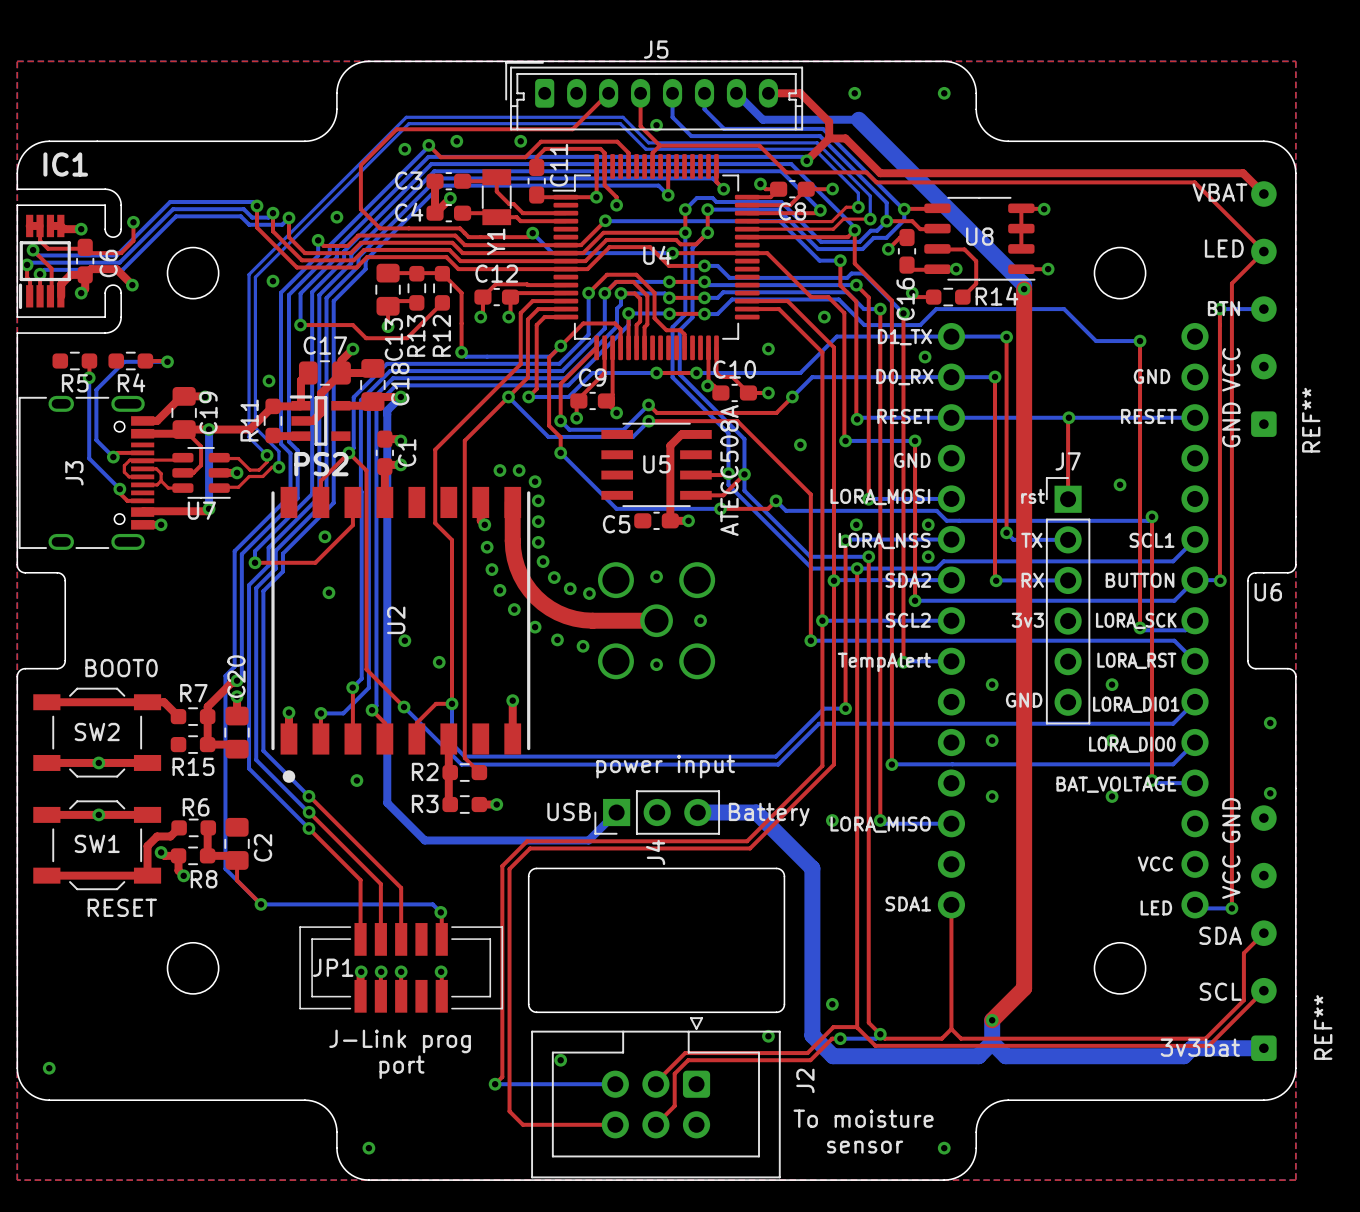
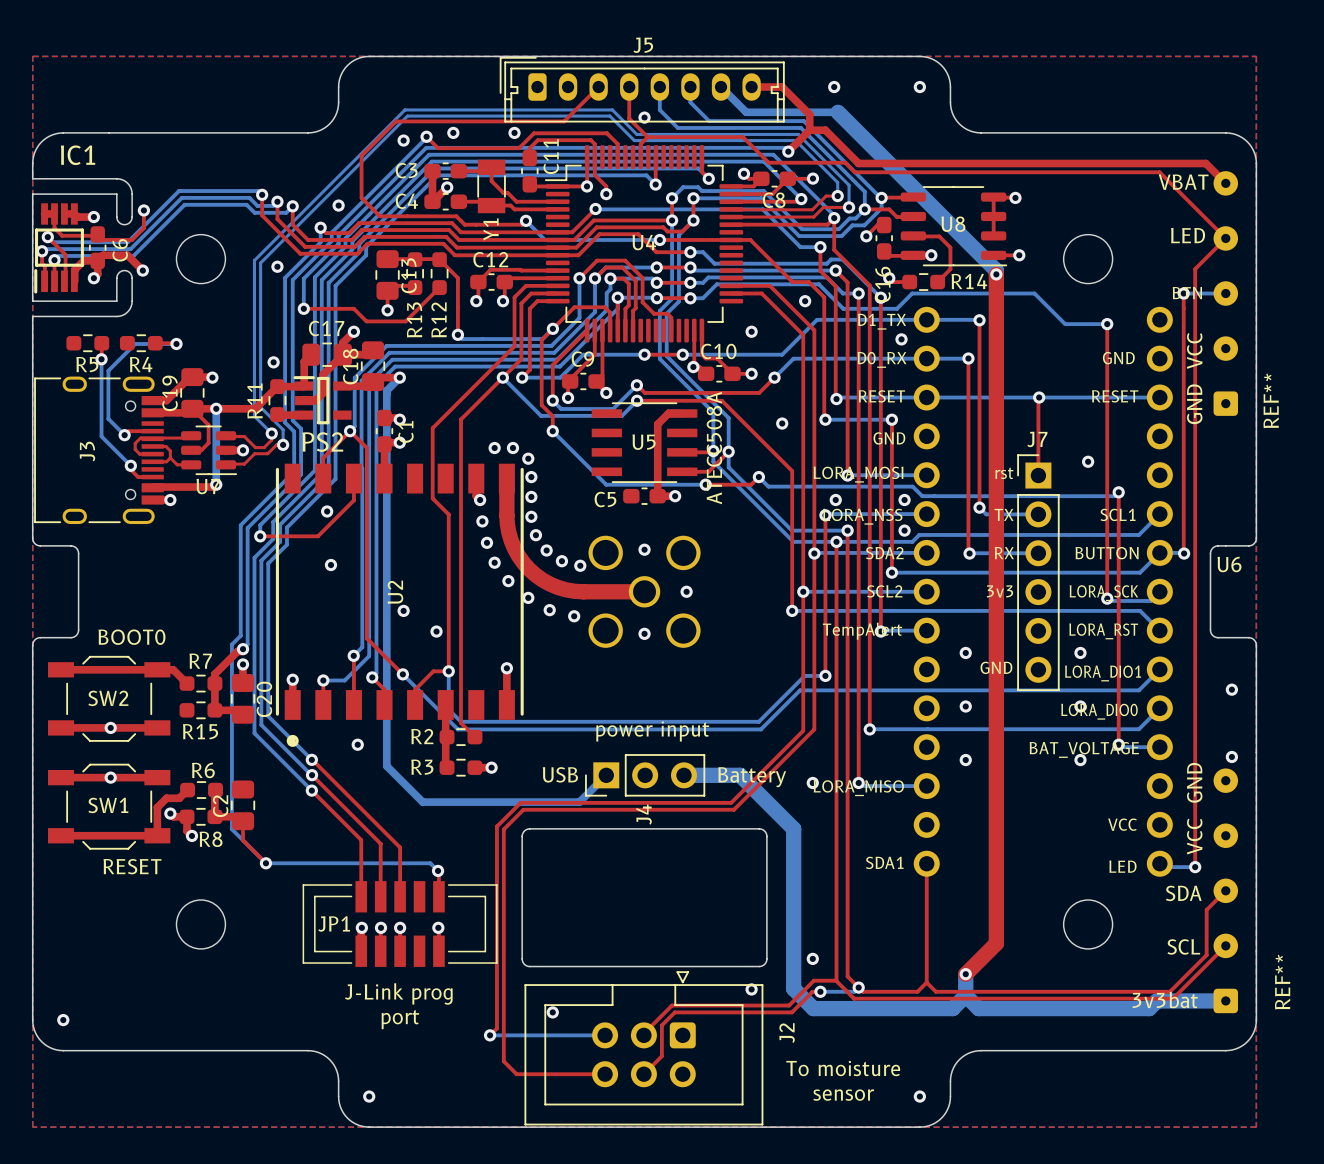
C13 name position: C13 (393, 339) -> C13 (408, 275)
C18 name position: C18 (400, 384) -> C18 (350, 366)
C19 name position: C19 (208, 412) -> C19 (170, 393)
C20 name position: C20 (236, 676) -> C20 (264, 699)
C2 name position: C2 (263, 847) -> C2 (220, 806)

